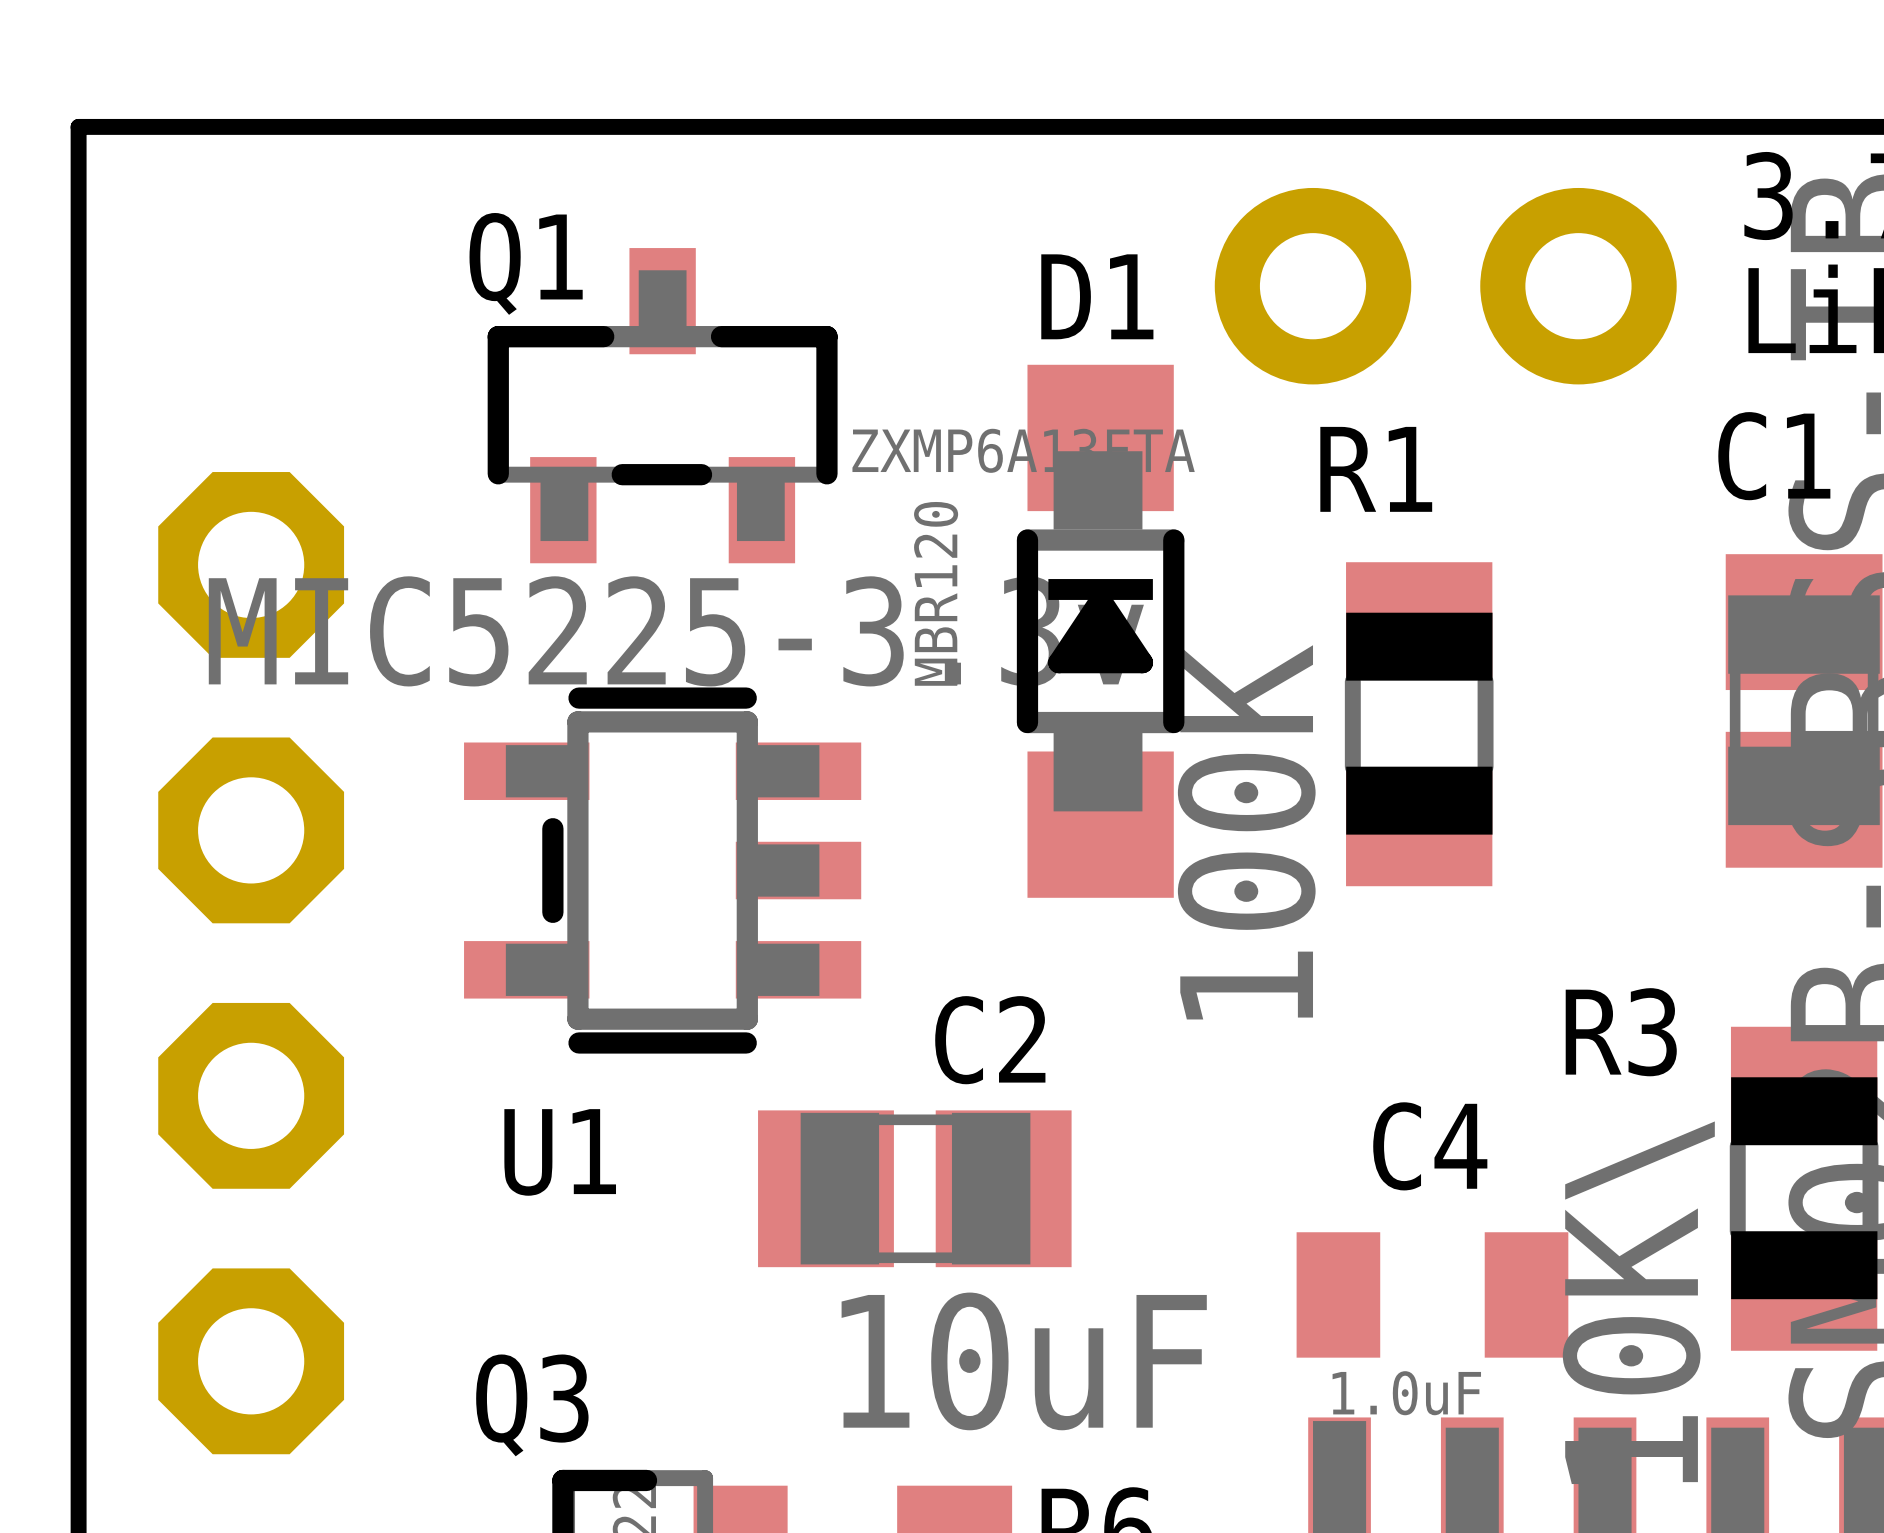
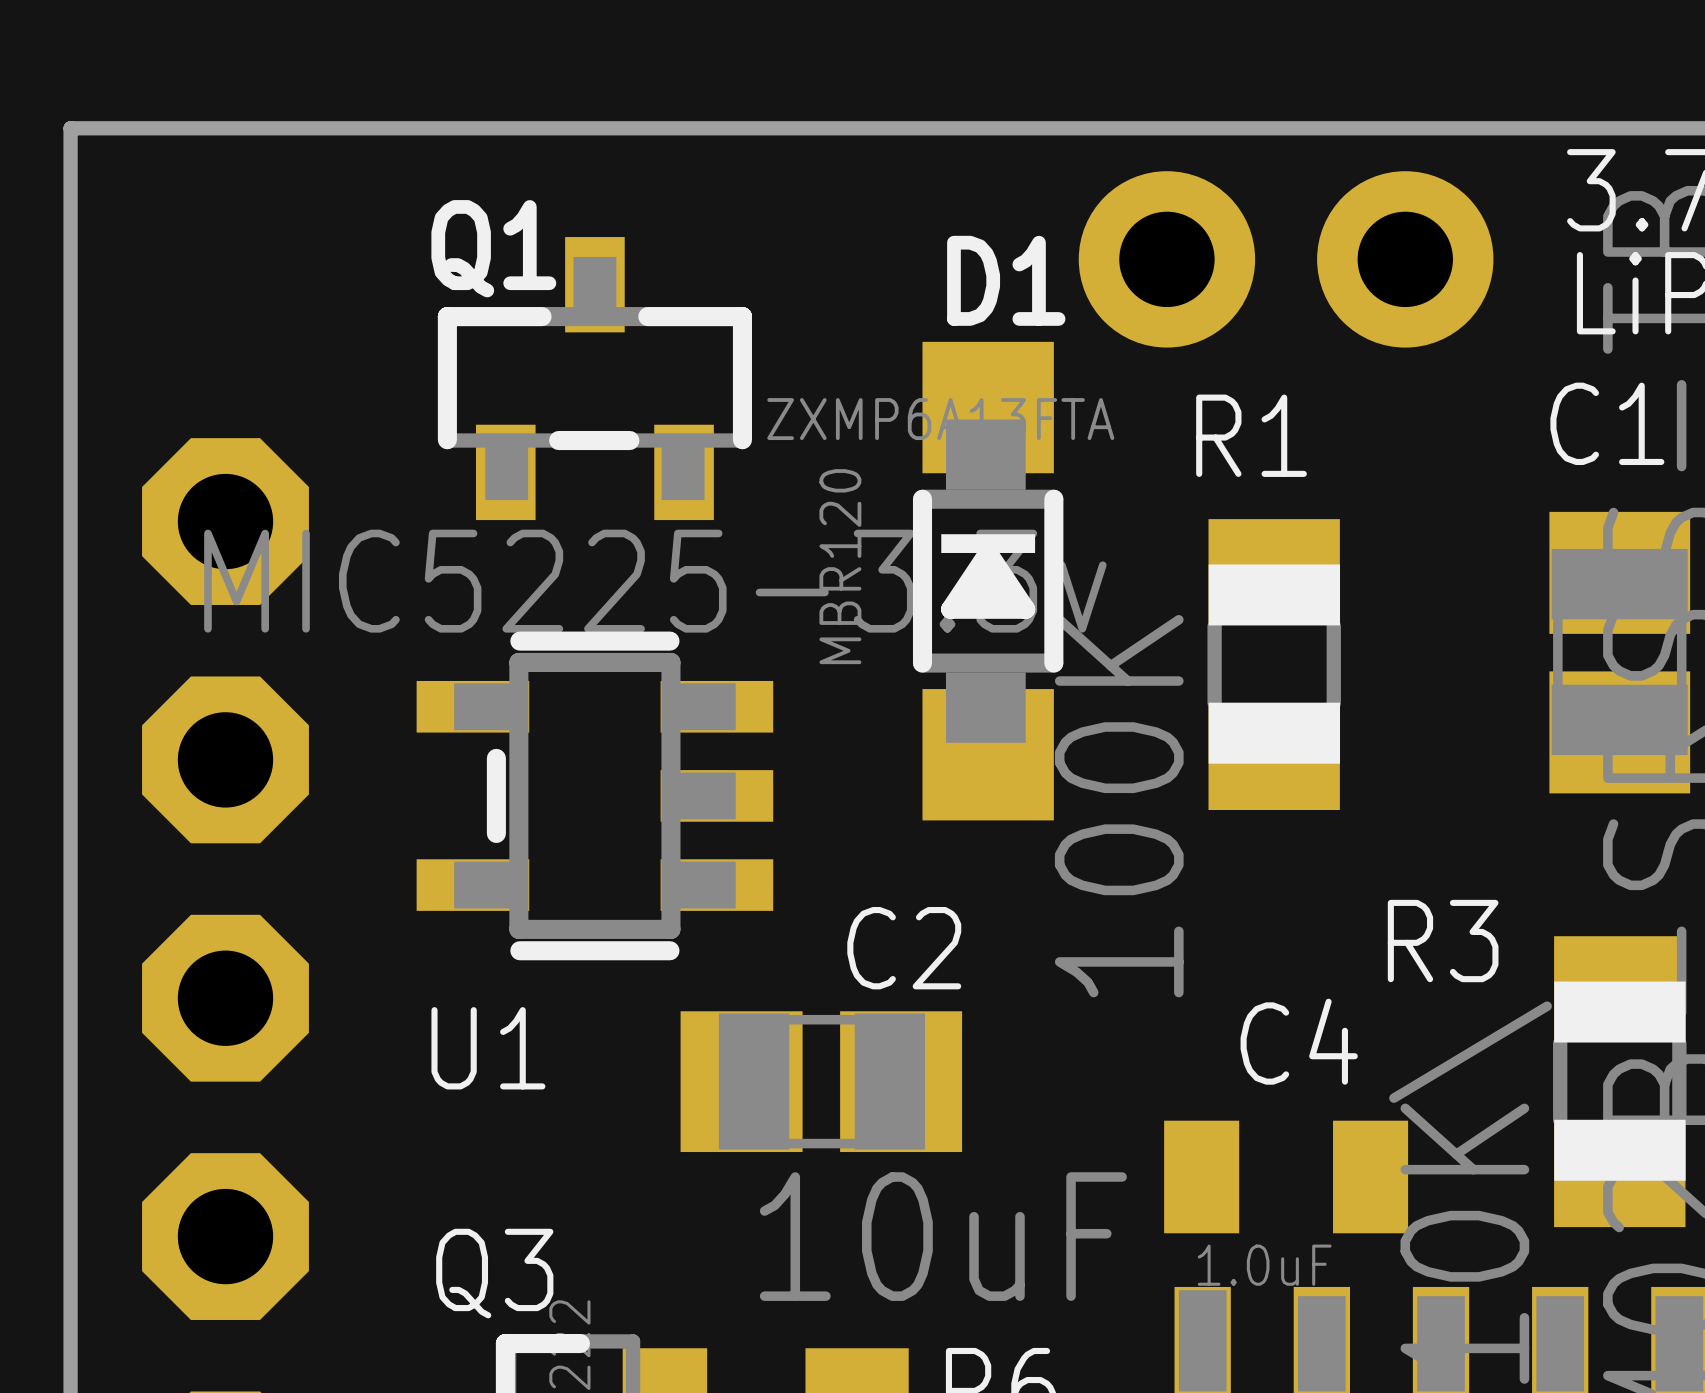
part position: (1445, 286) -> (1286, 259)

